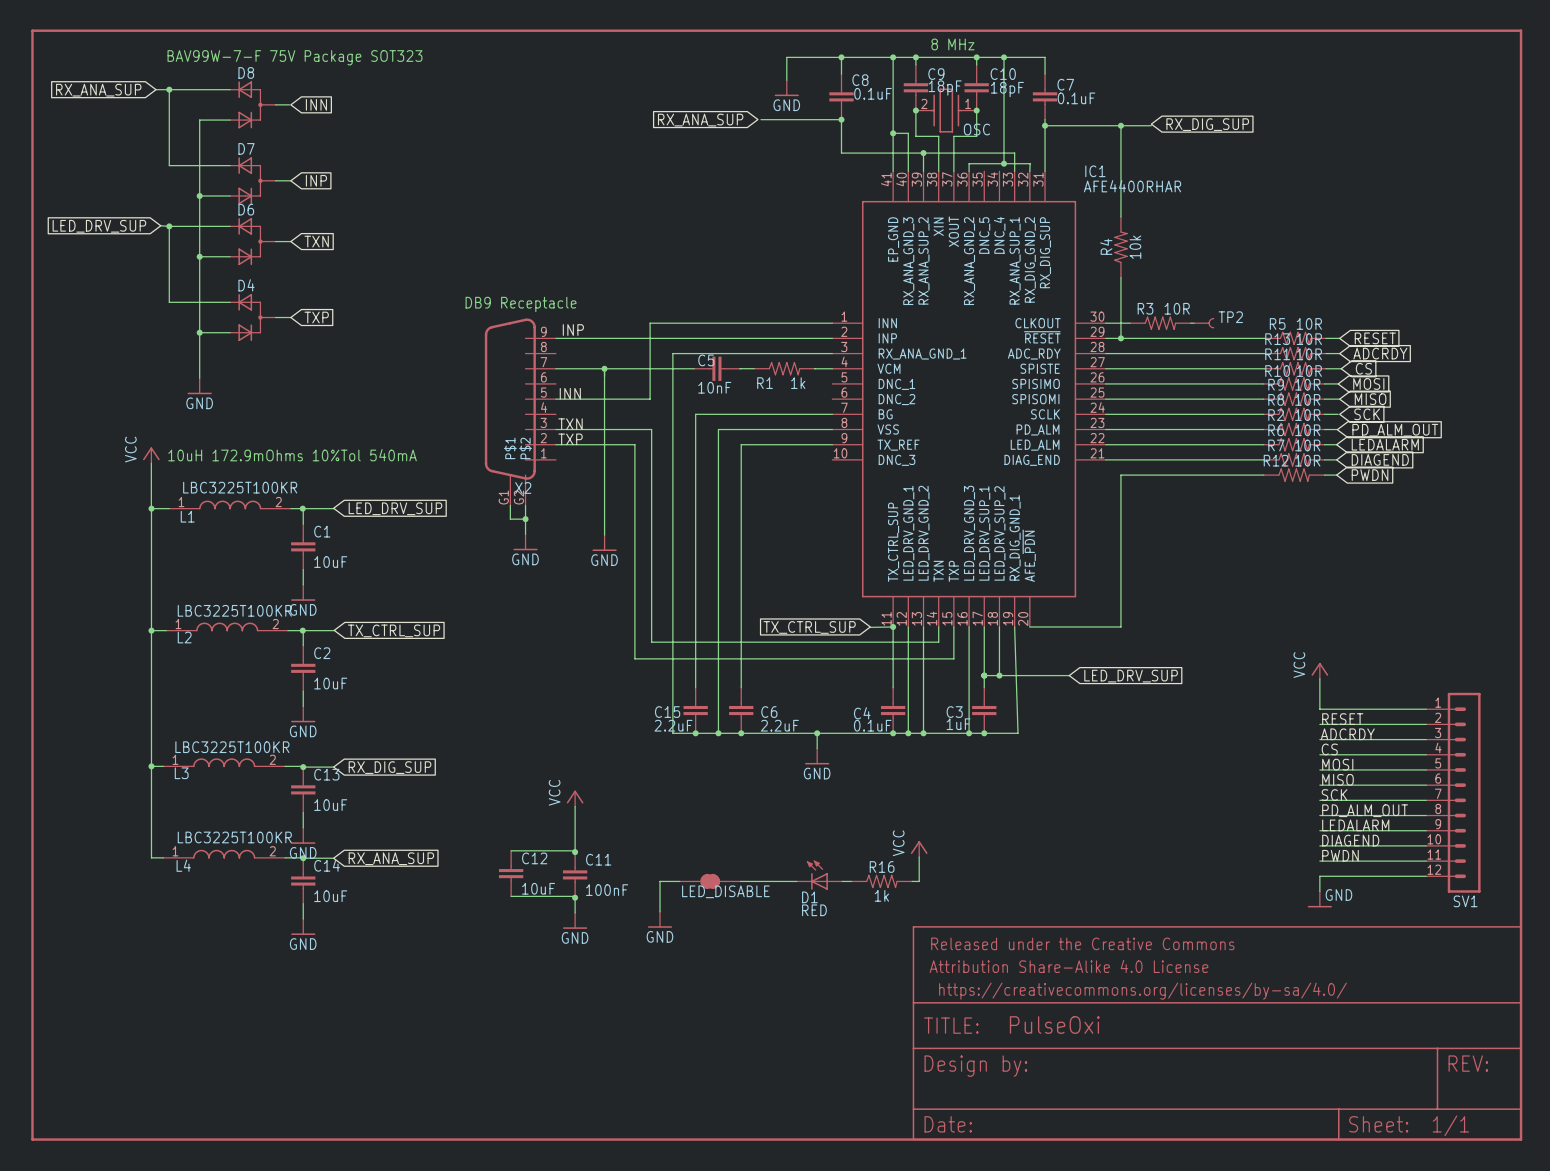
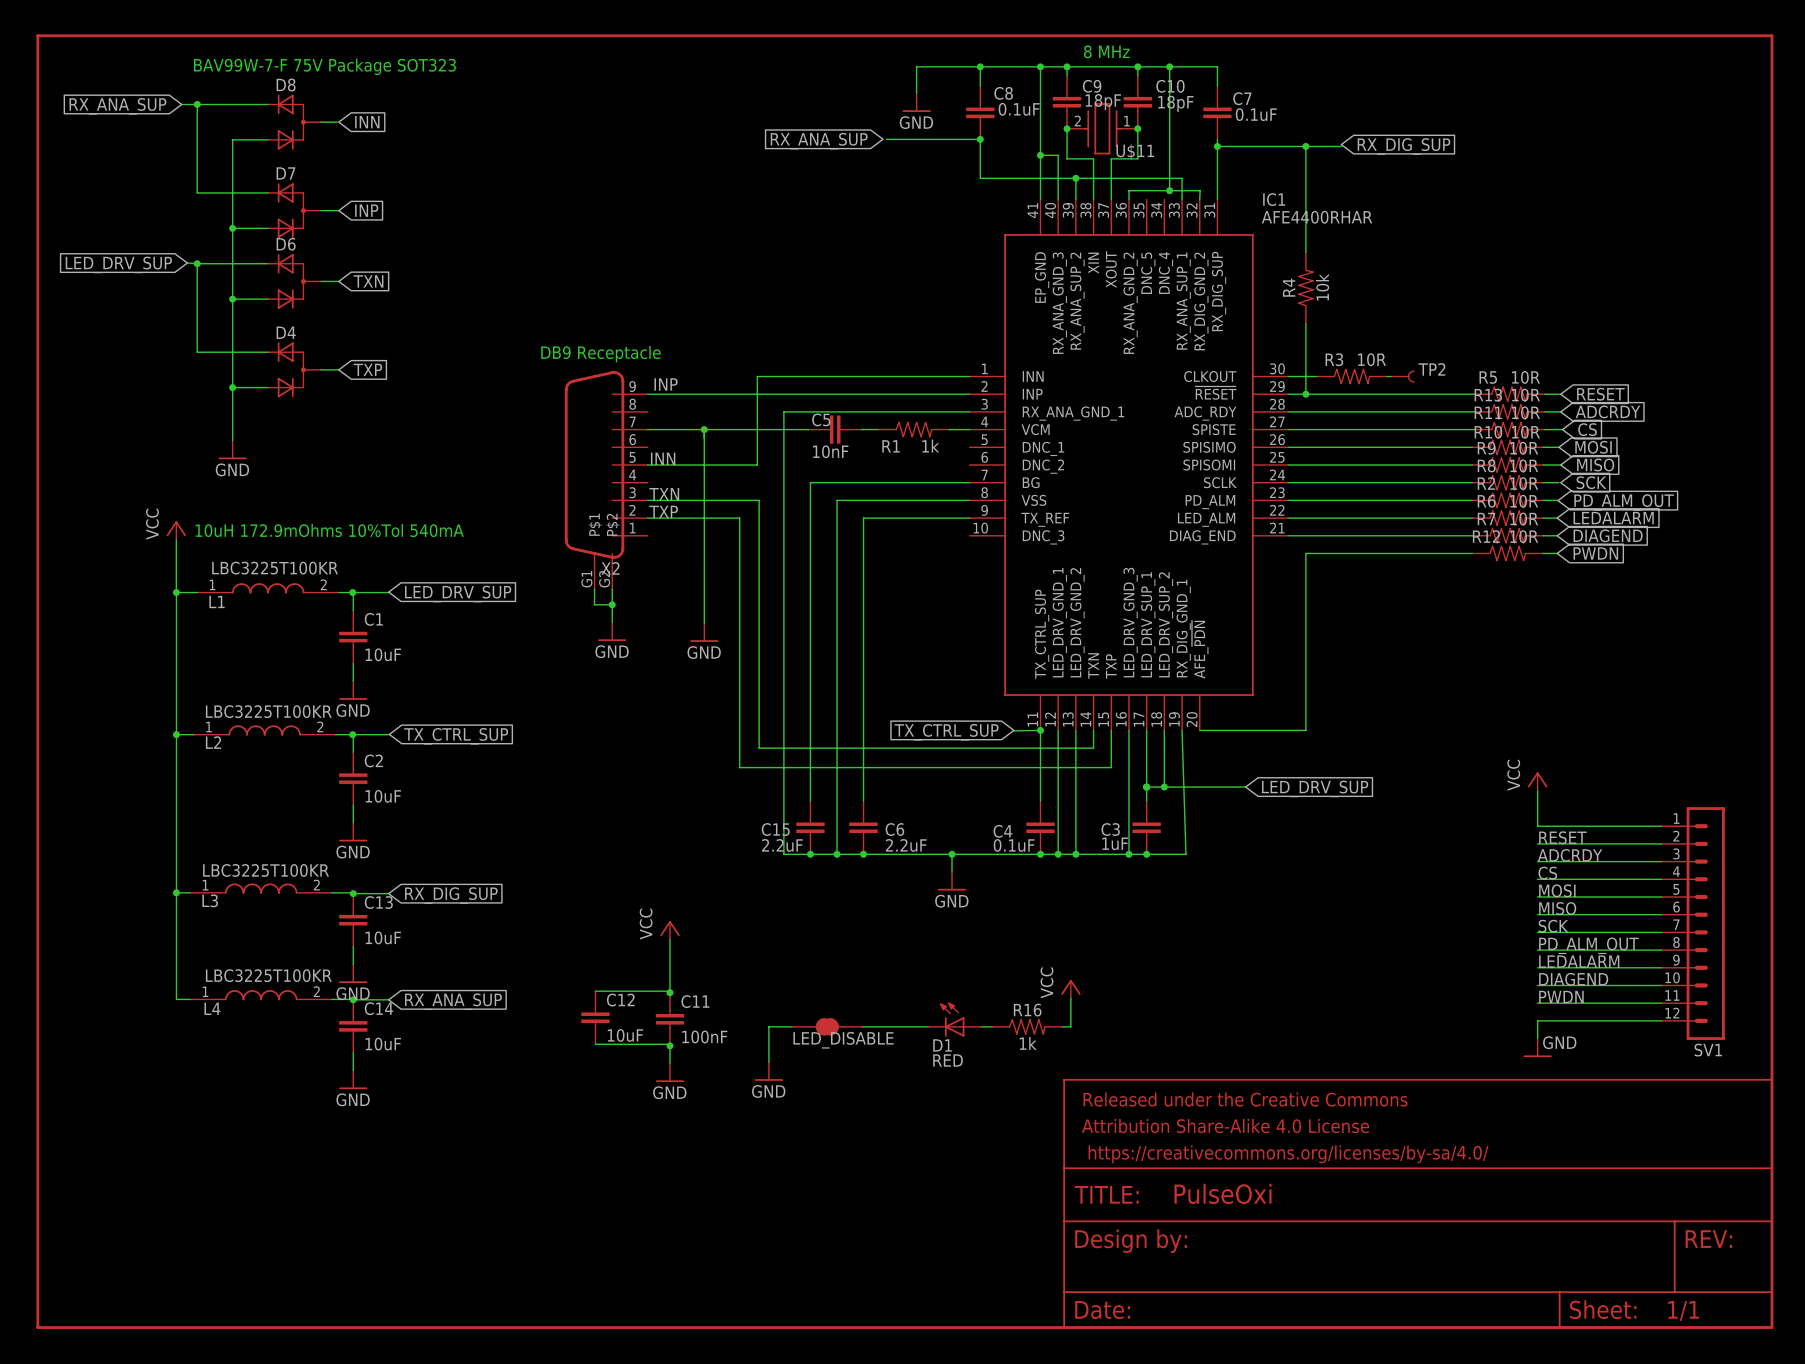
OSC name: OSC (976, 129) -> U$11 (1135, 151)

